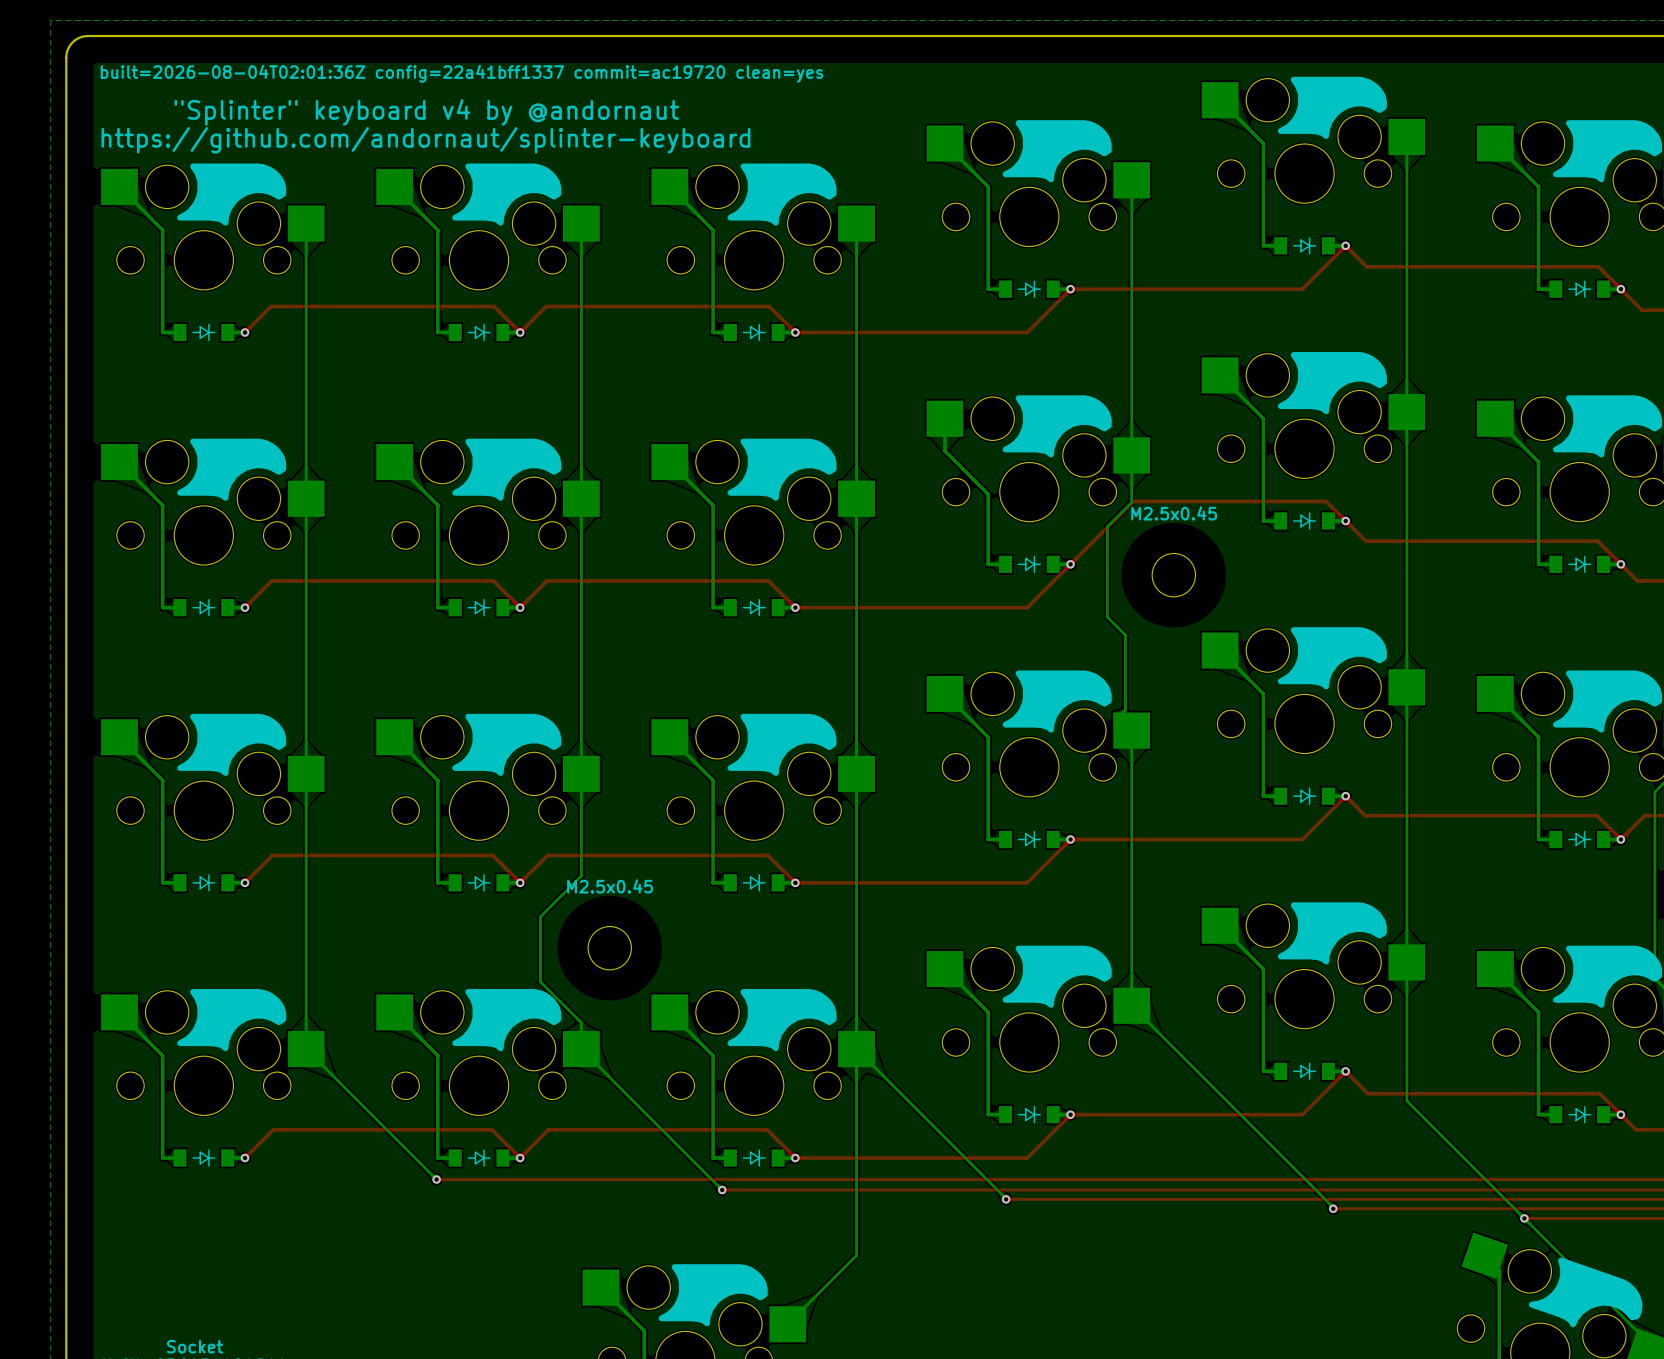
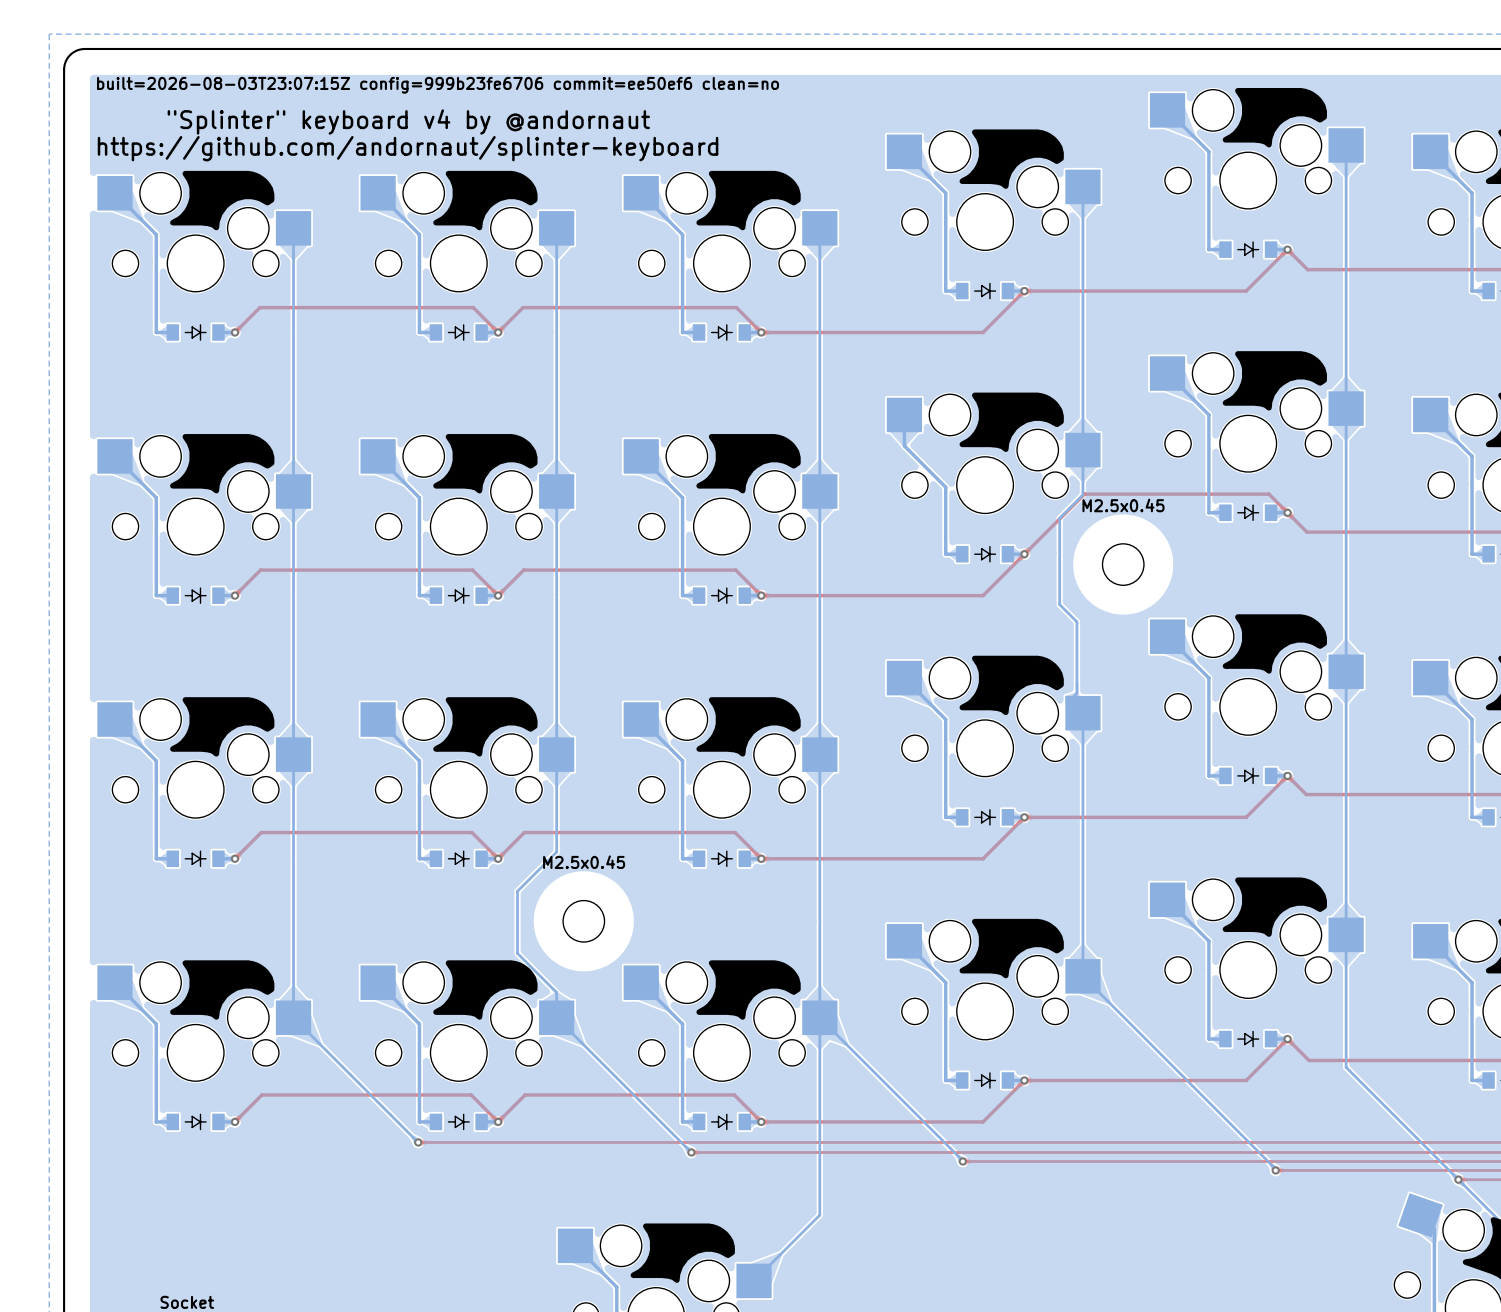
text: built=2026-08-04T02:01:36Z config=22a41bff1337 commit=ac19720 clean=yes (461, 73) -> built=2026-08-03T23:07:15Z config=999b23fe6706 commit=ee50ef6 clean=no (438, 85)

